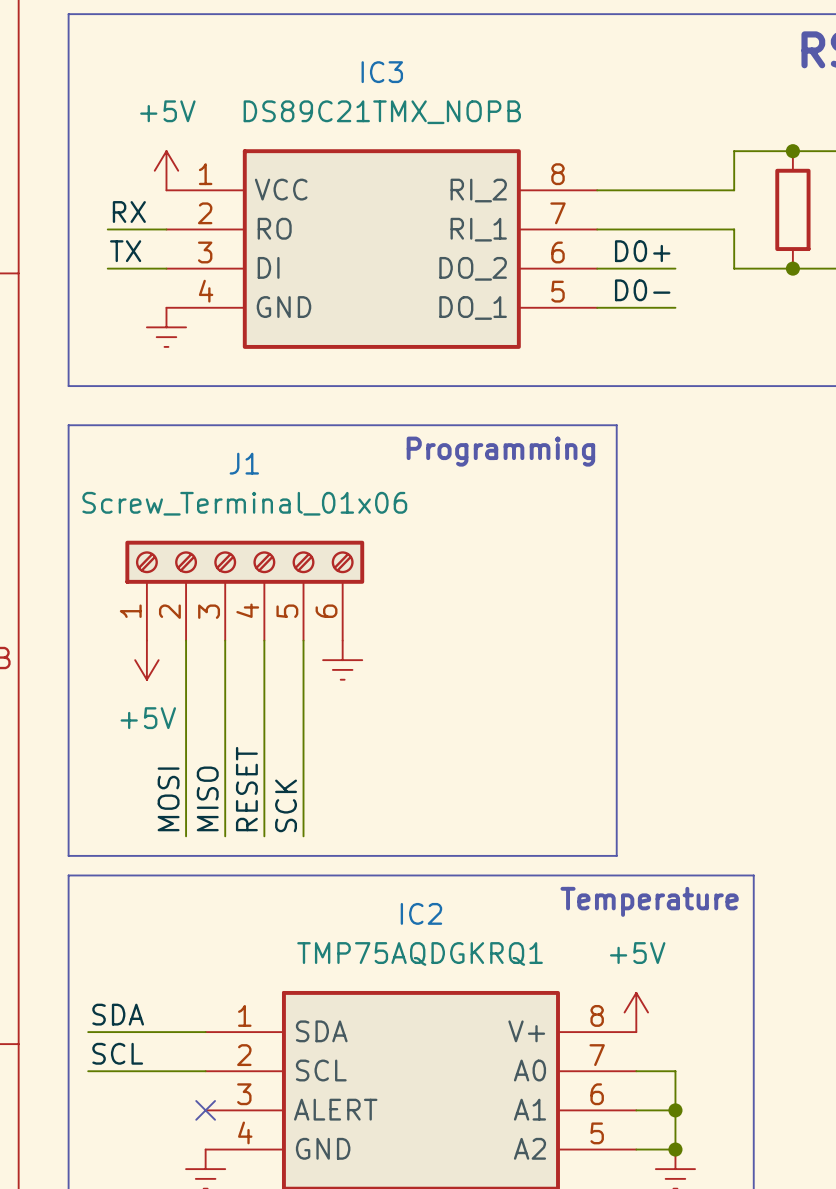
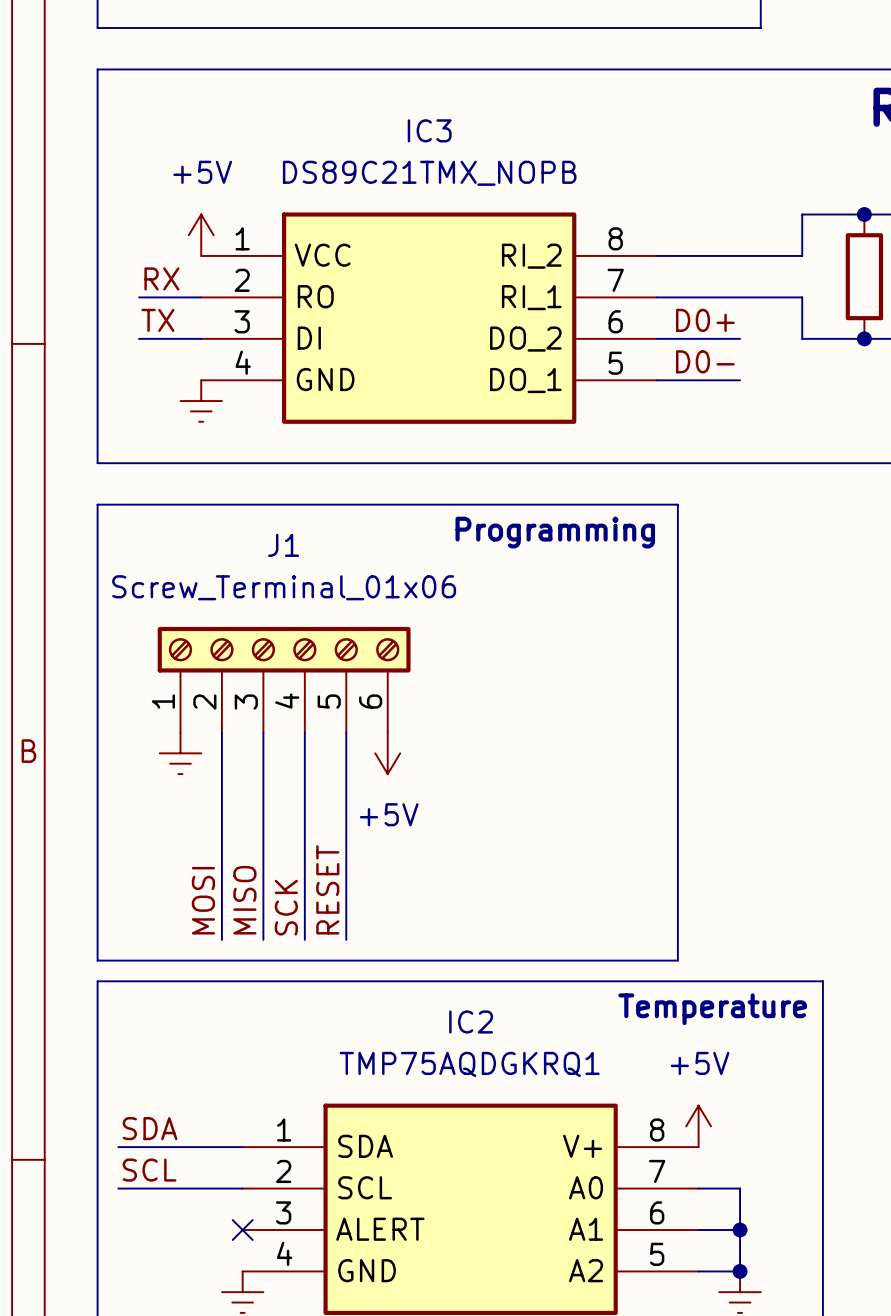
power symbol shape: [135, 640, 159, 680] -> [159, 732, 202, 775]
power symbol shape: [323, 640, 363, 680] -> [375, 732, 401, 775]
power symbol text: +5V (148, 718) -> none
power symbol text: none -> +5V (389, 814)
label: RESET (246, 789) -> SCK (286, 907)
label: SCK (286, 805) -> RESET (327, 889)

